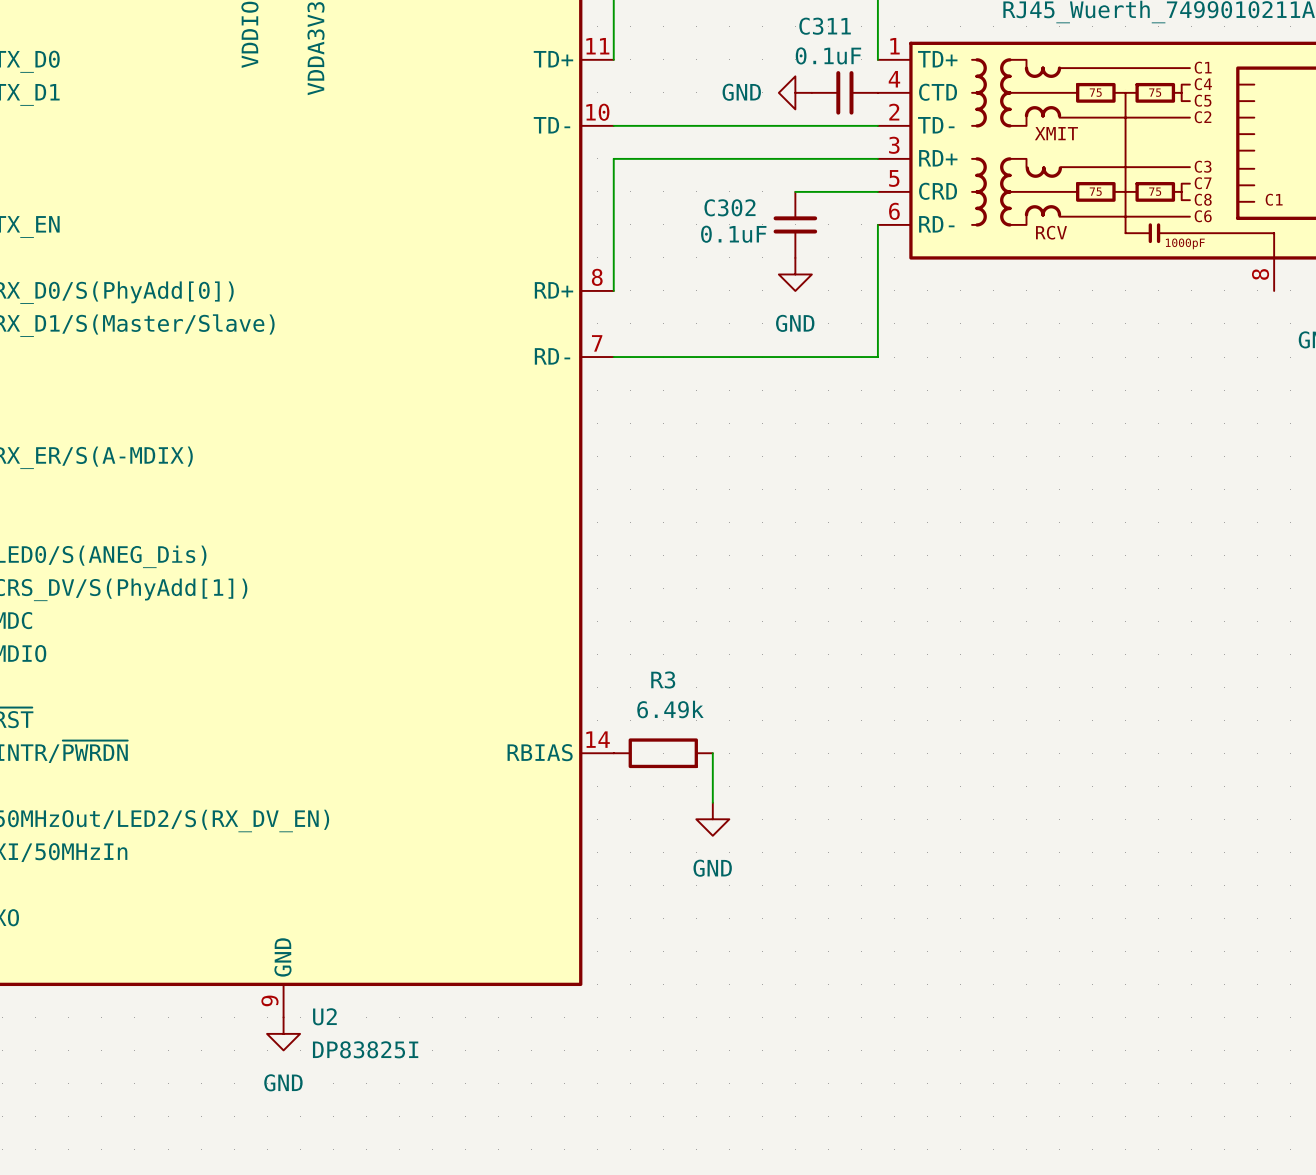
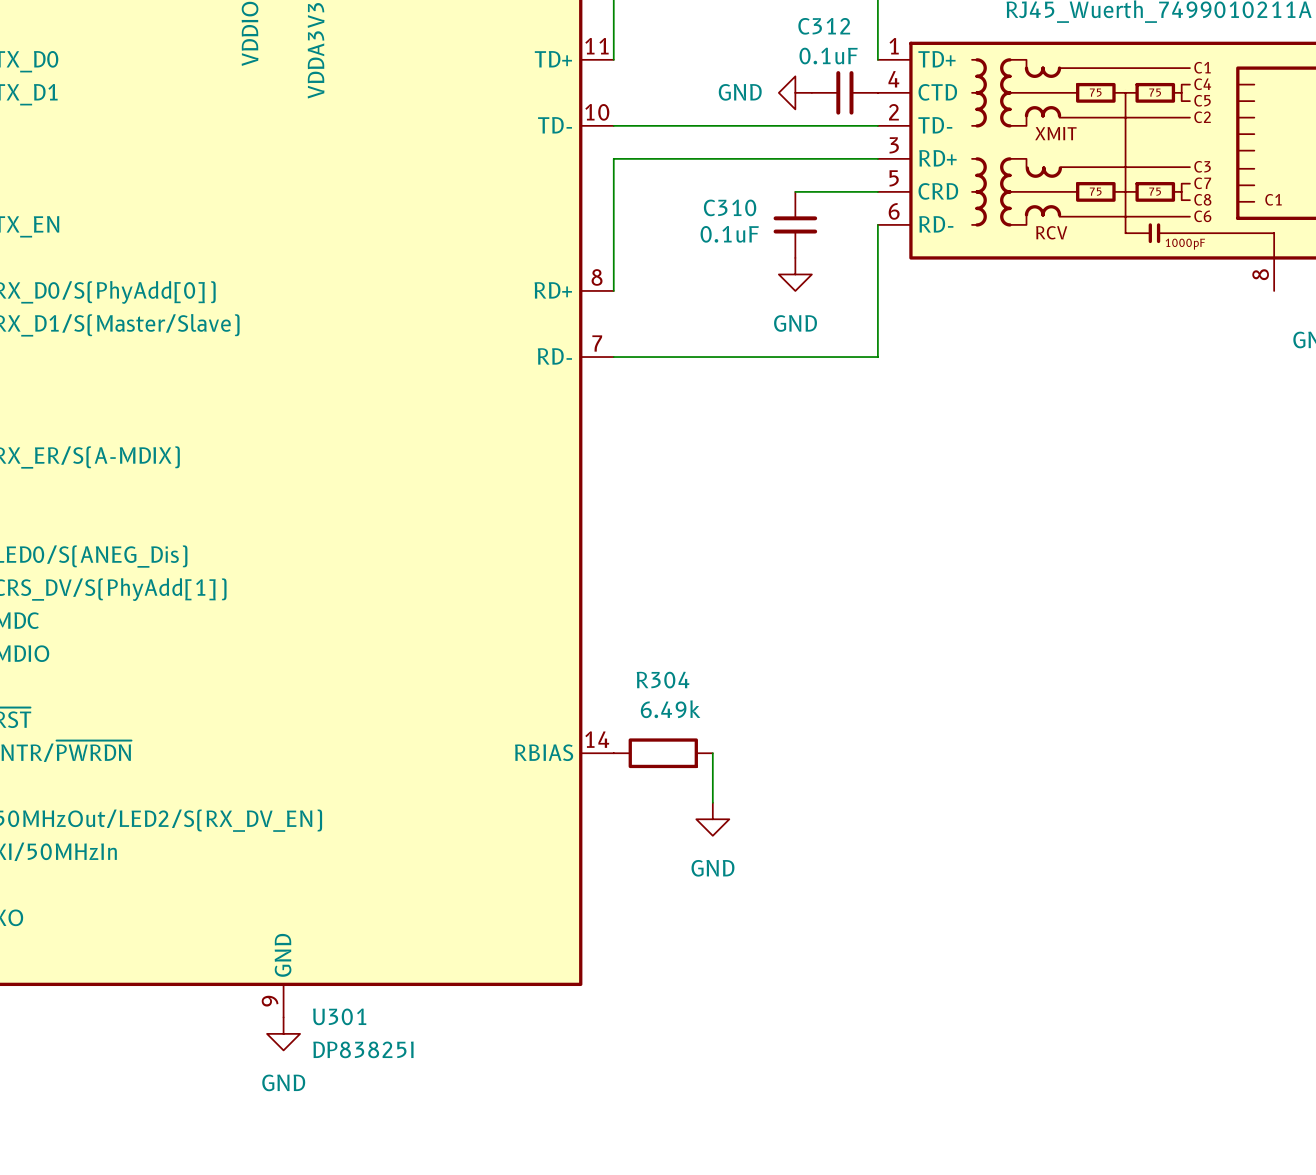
C311 name: C311 (825, 26) -> C312 (824, 26)
C302 name: C302 (729, 207) -> C310 (730, 207)
R3 name: R3 (663, 679) -> R304 (663, 680)
U2 name: U2 (324, 1016) -> U301 (339, 1016)

